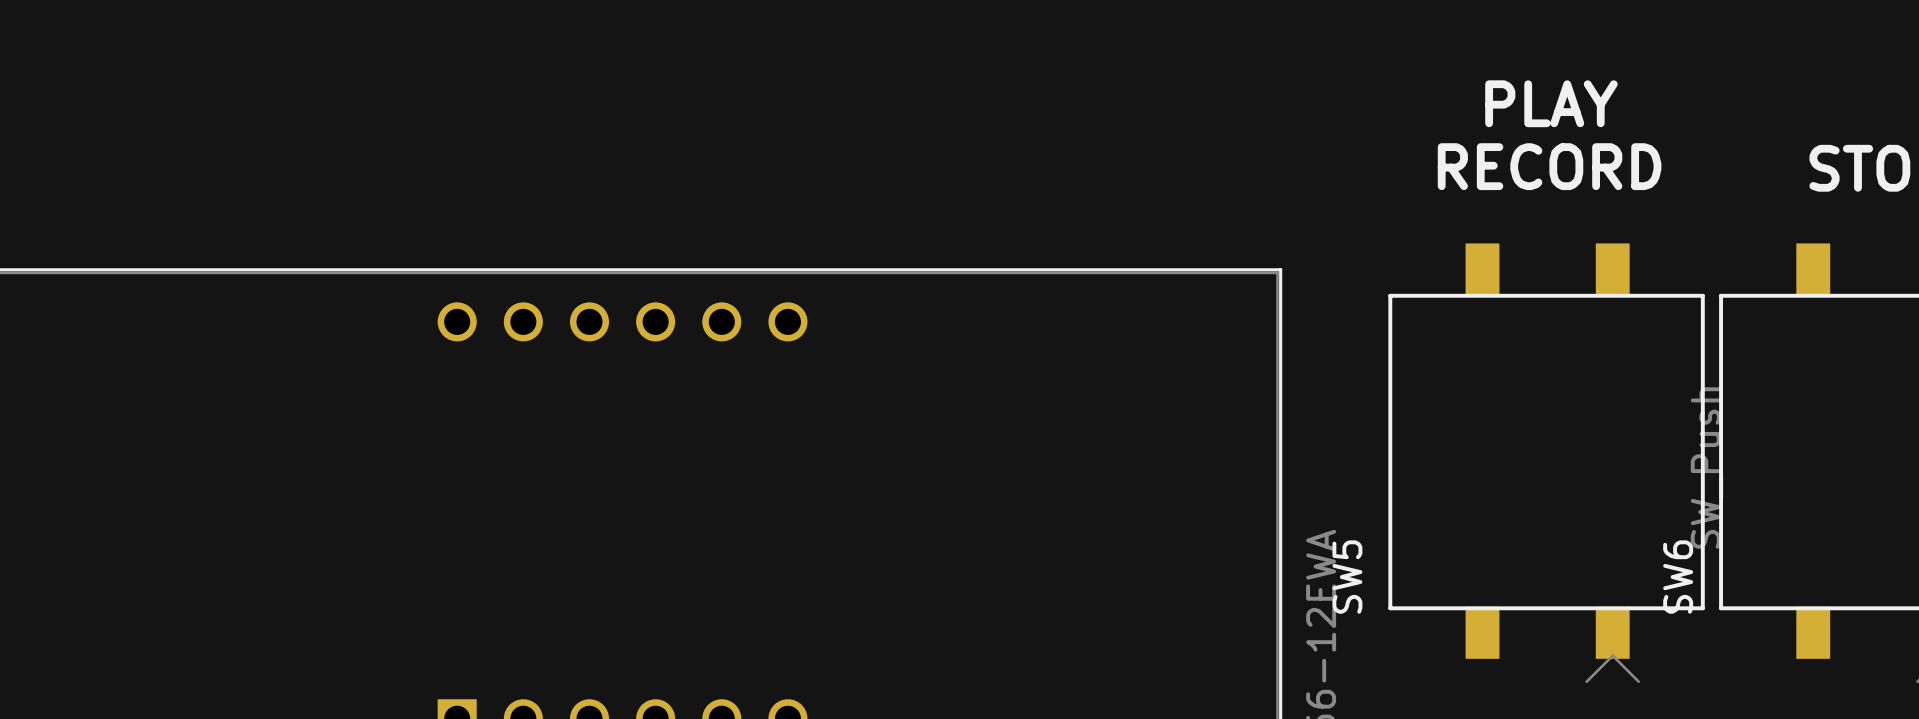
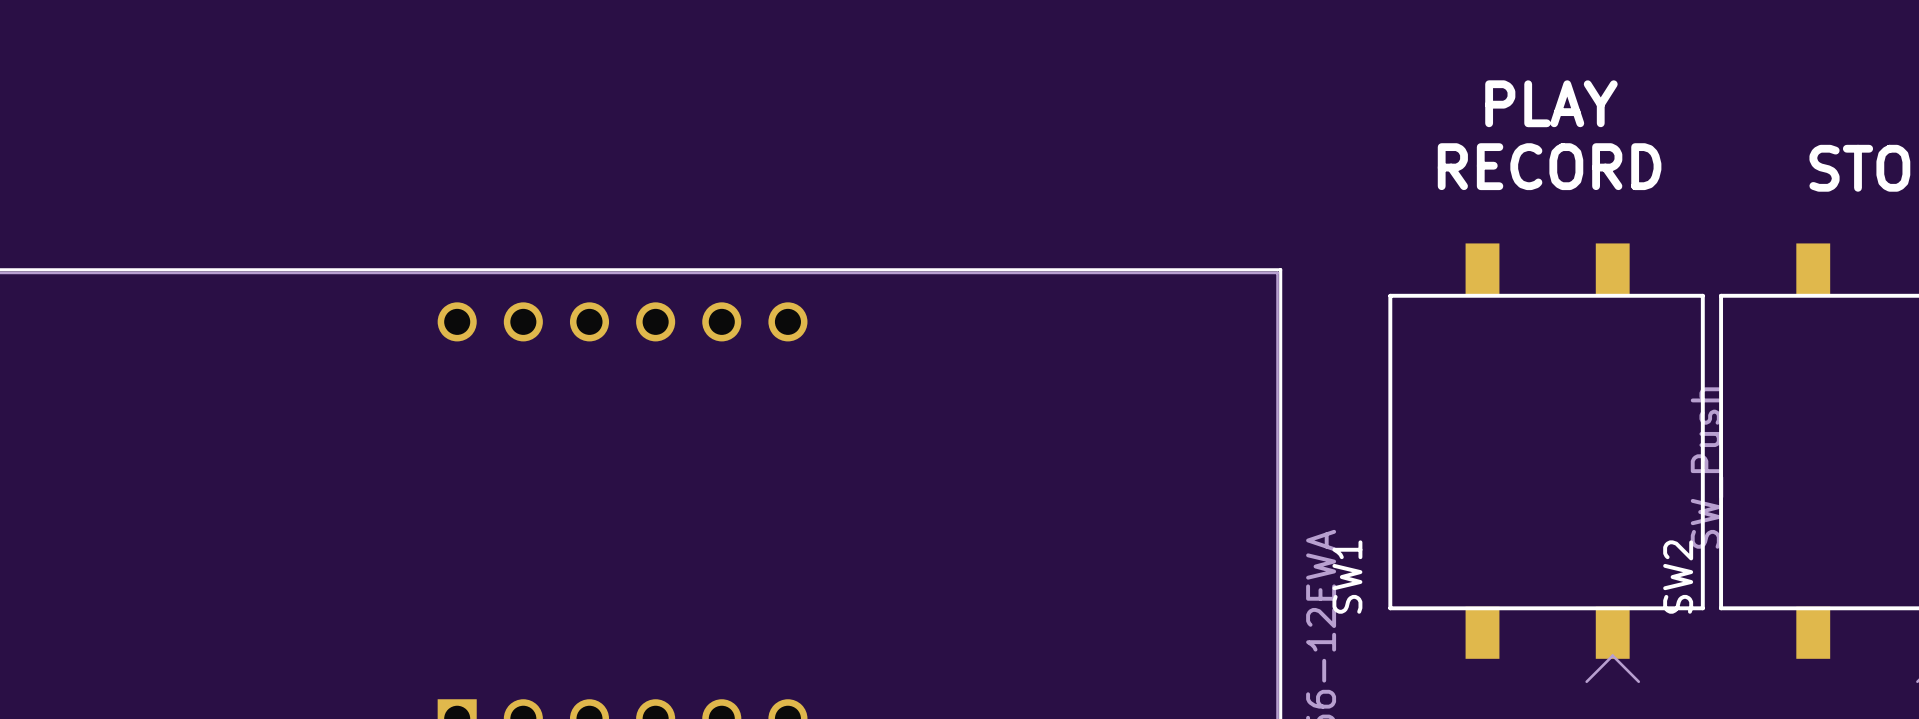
SW5 name: SW5 (1347, 577) -> SW1 (1347, 577)
SW6 name: SW6 (1678, 577) -> SW2 (1678, 577)

